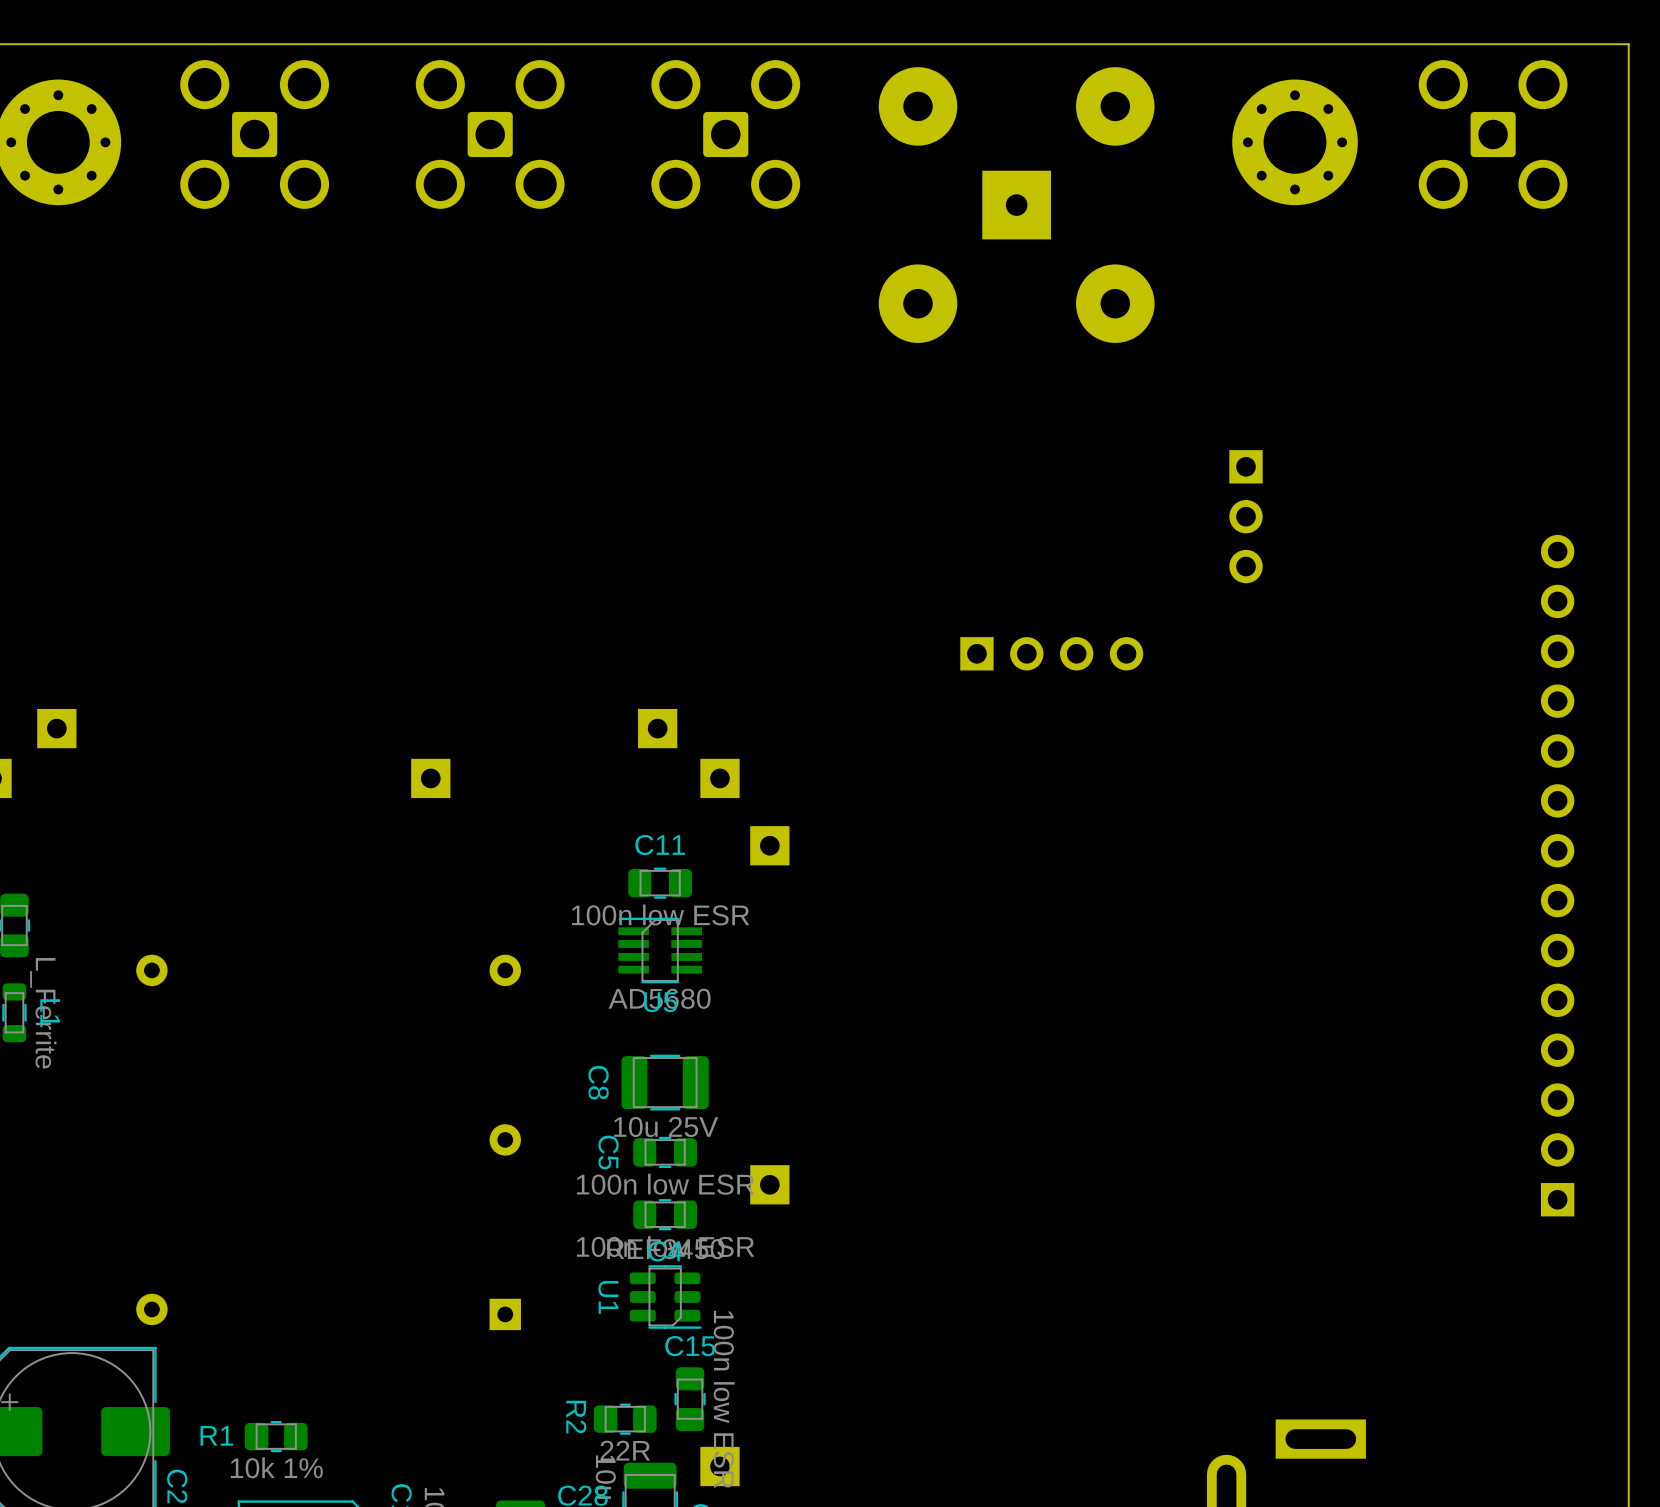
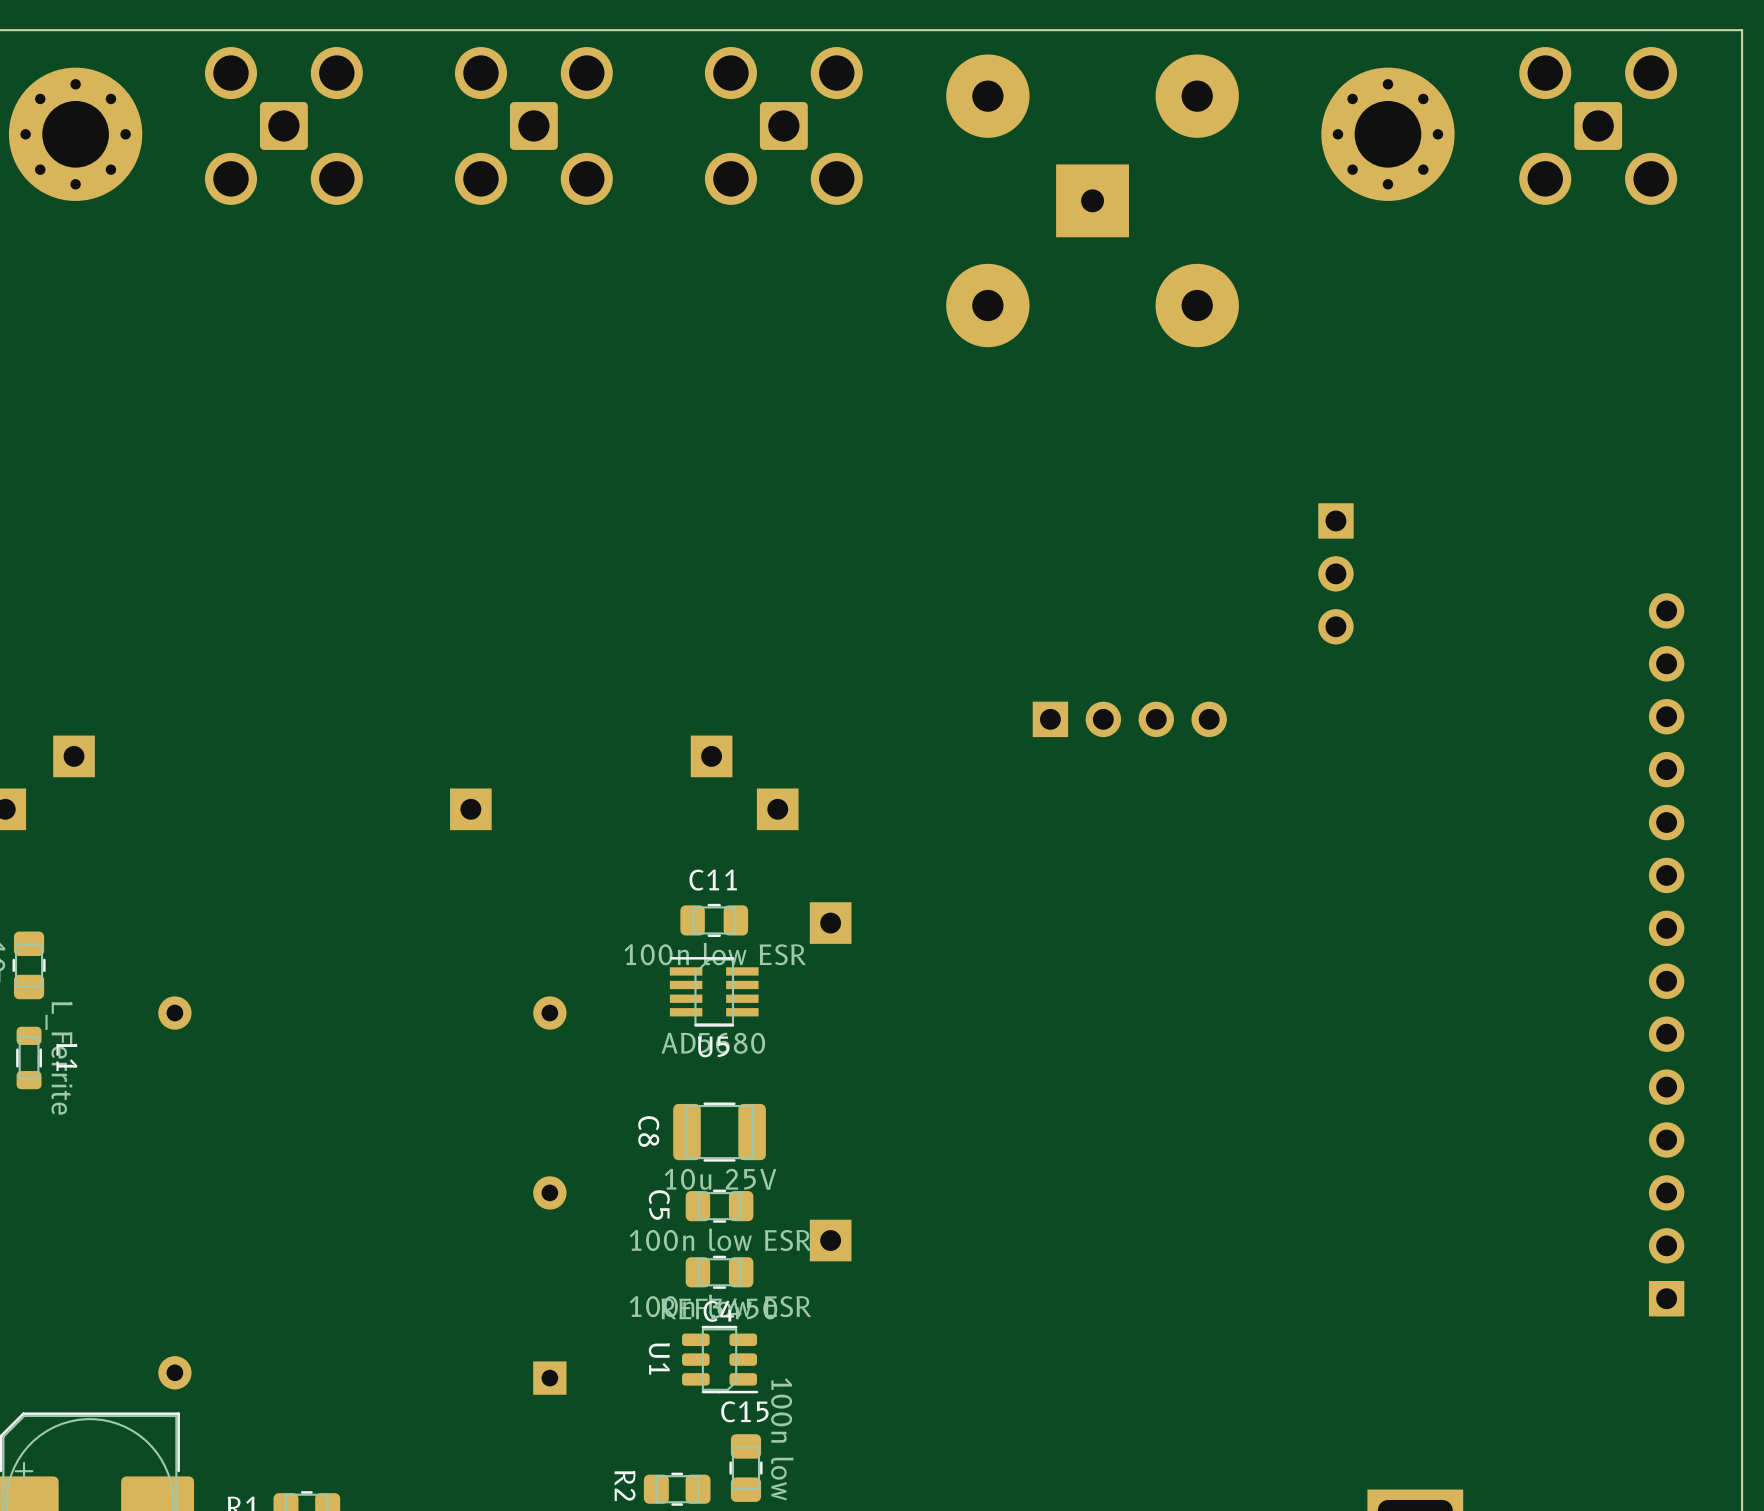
part position: (1246, 516) -> (1335, 573)
part position: (1051, 653) -> (1129, 719)
part position: (769, 845) -> (830, 923)
part position: (1557, 875) -> (1666, 954)

